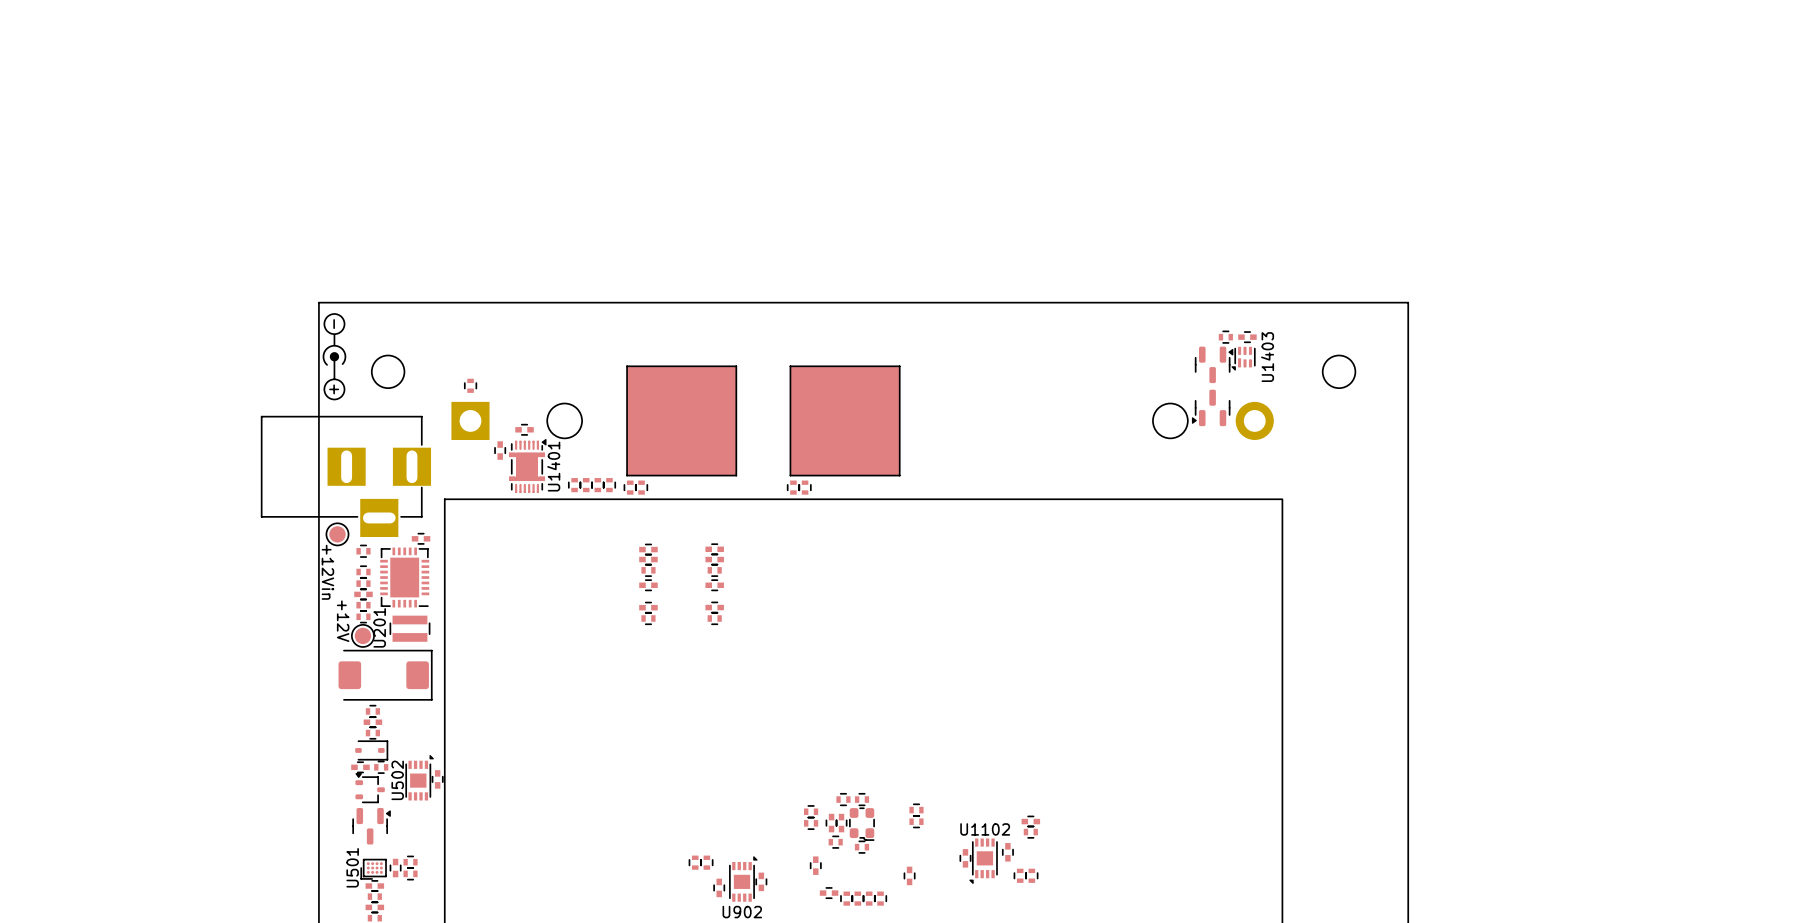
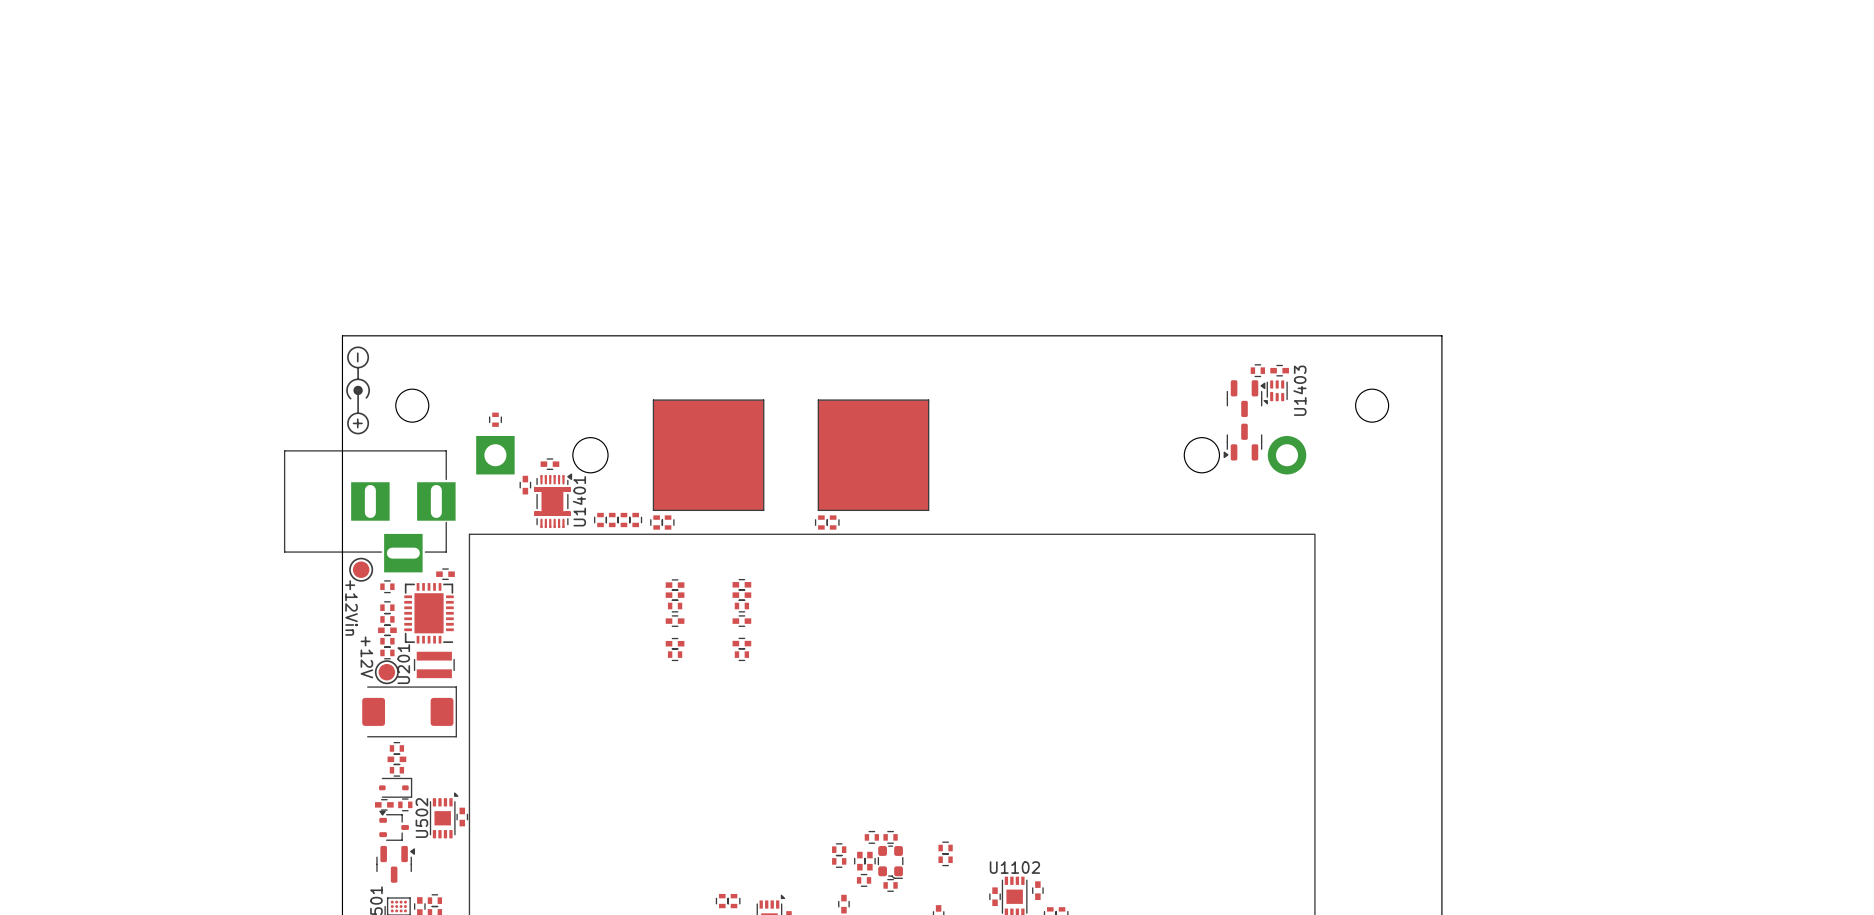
part: (1030, 821) -> none
part: (1030, 832) -> none

